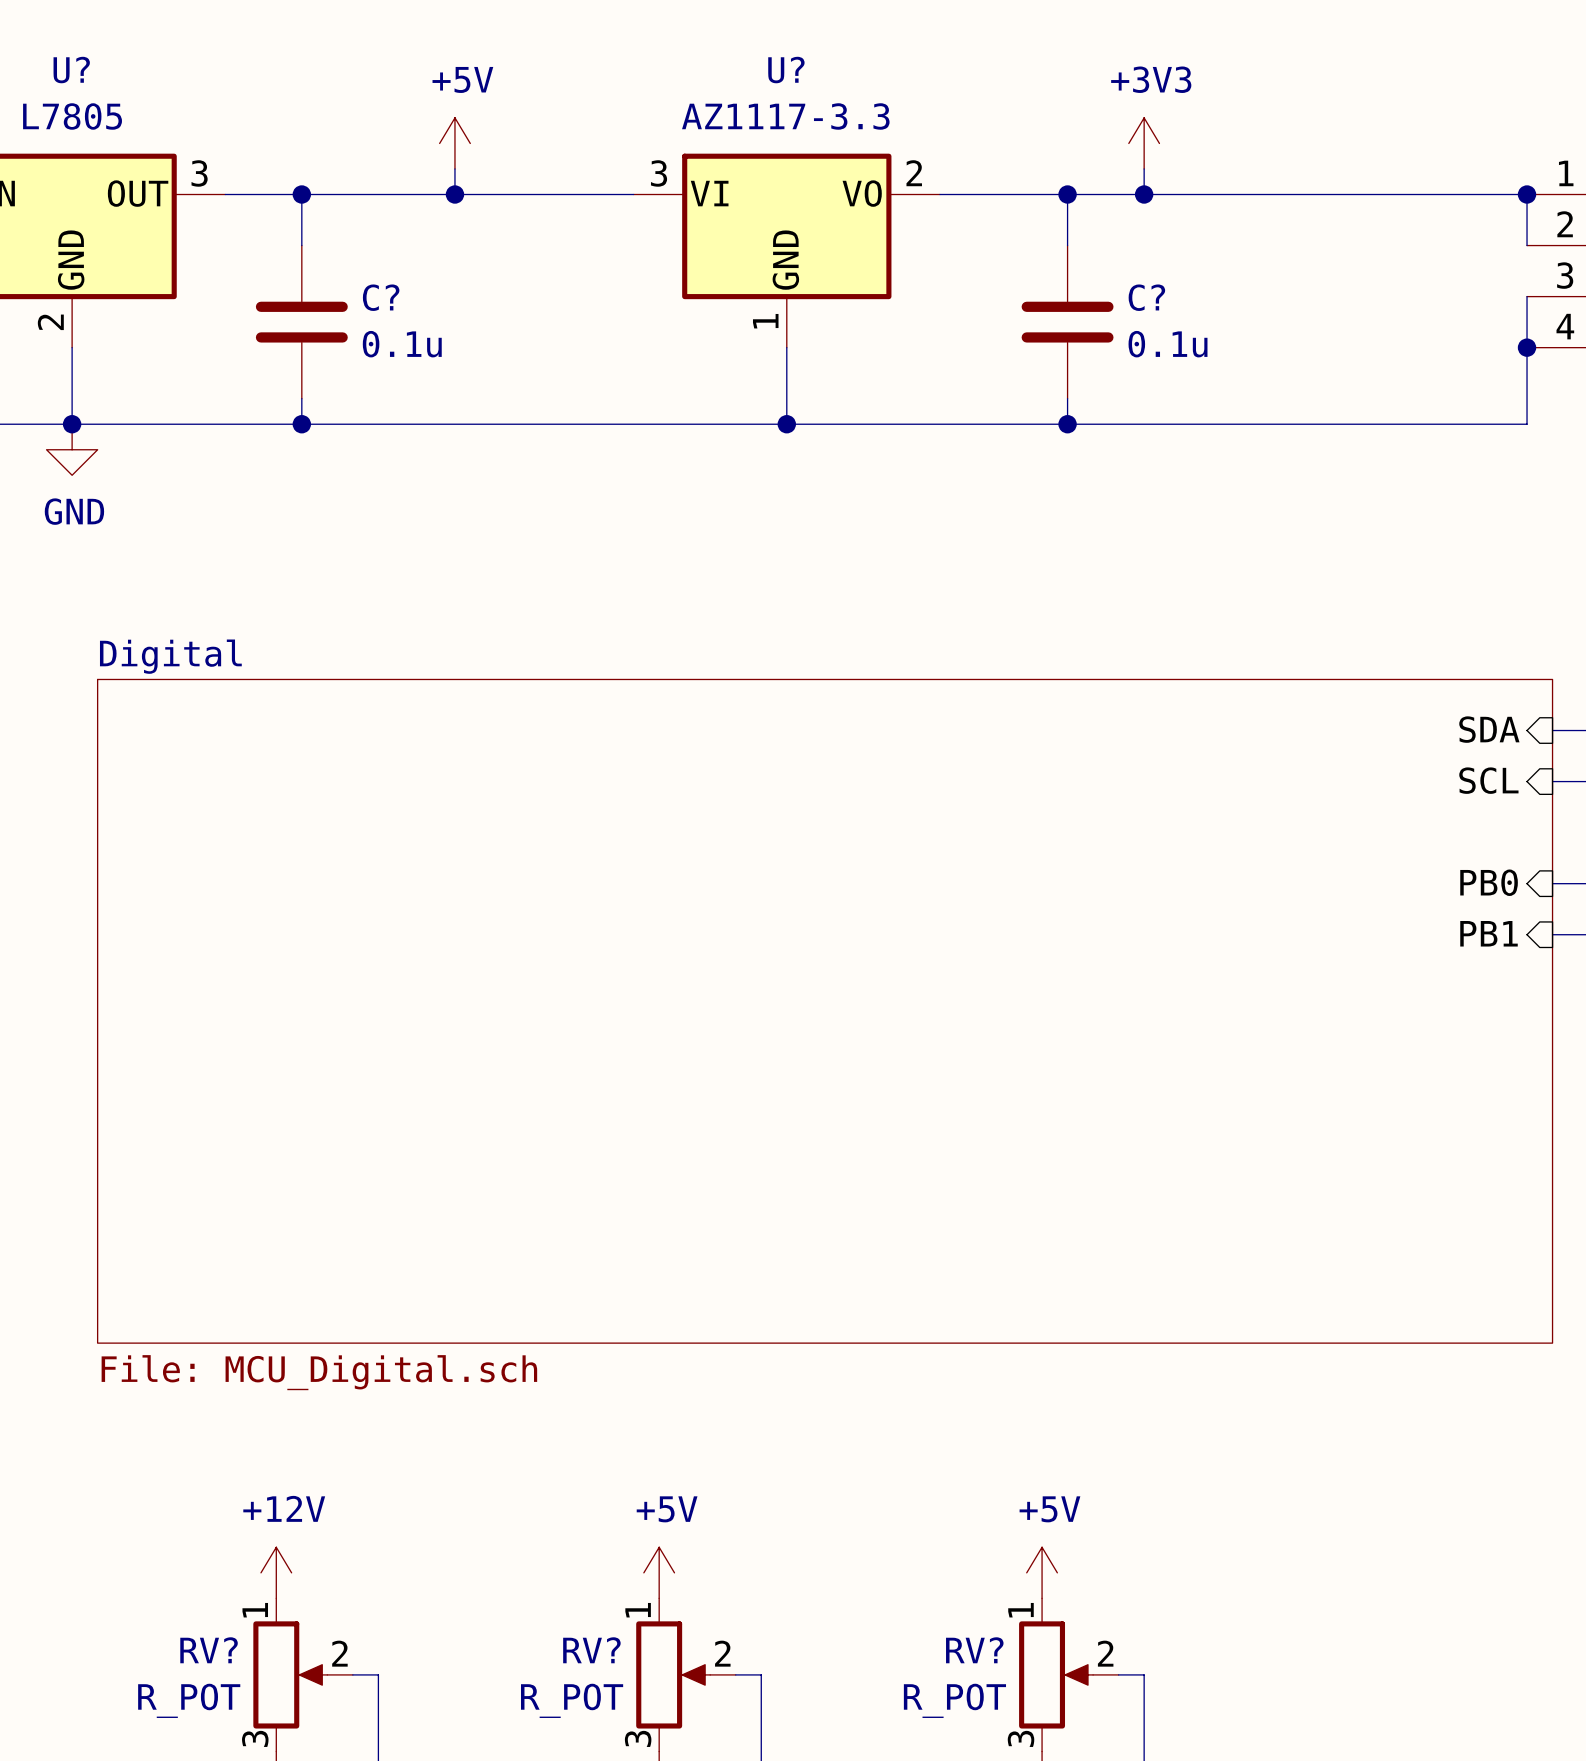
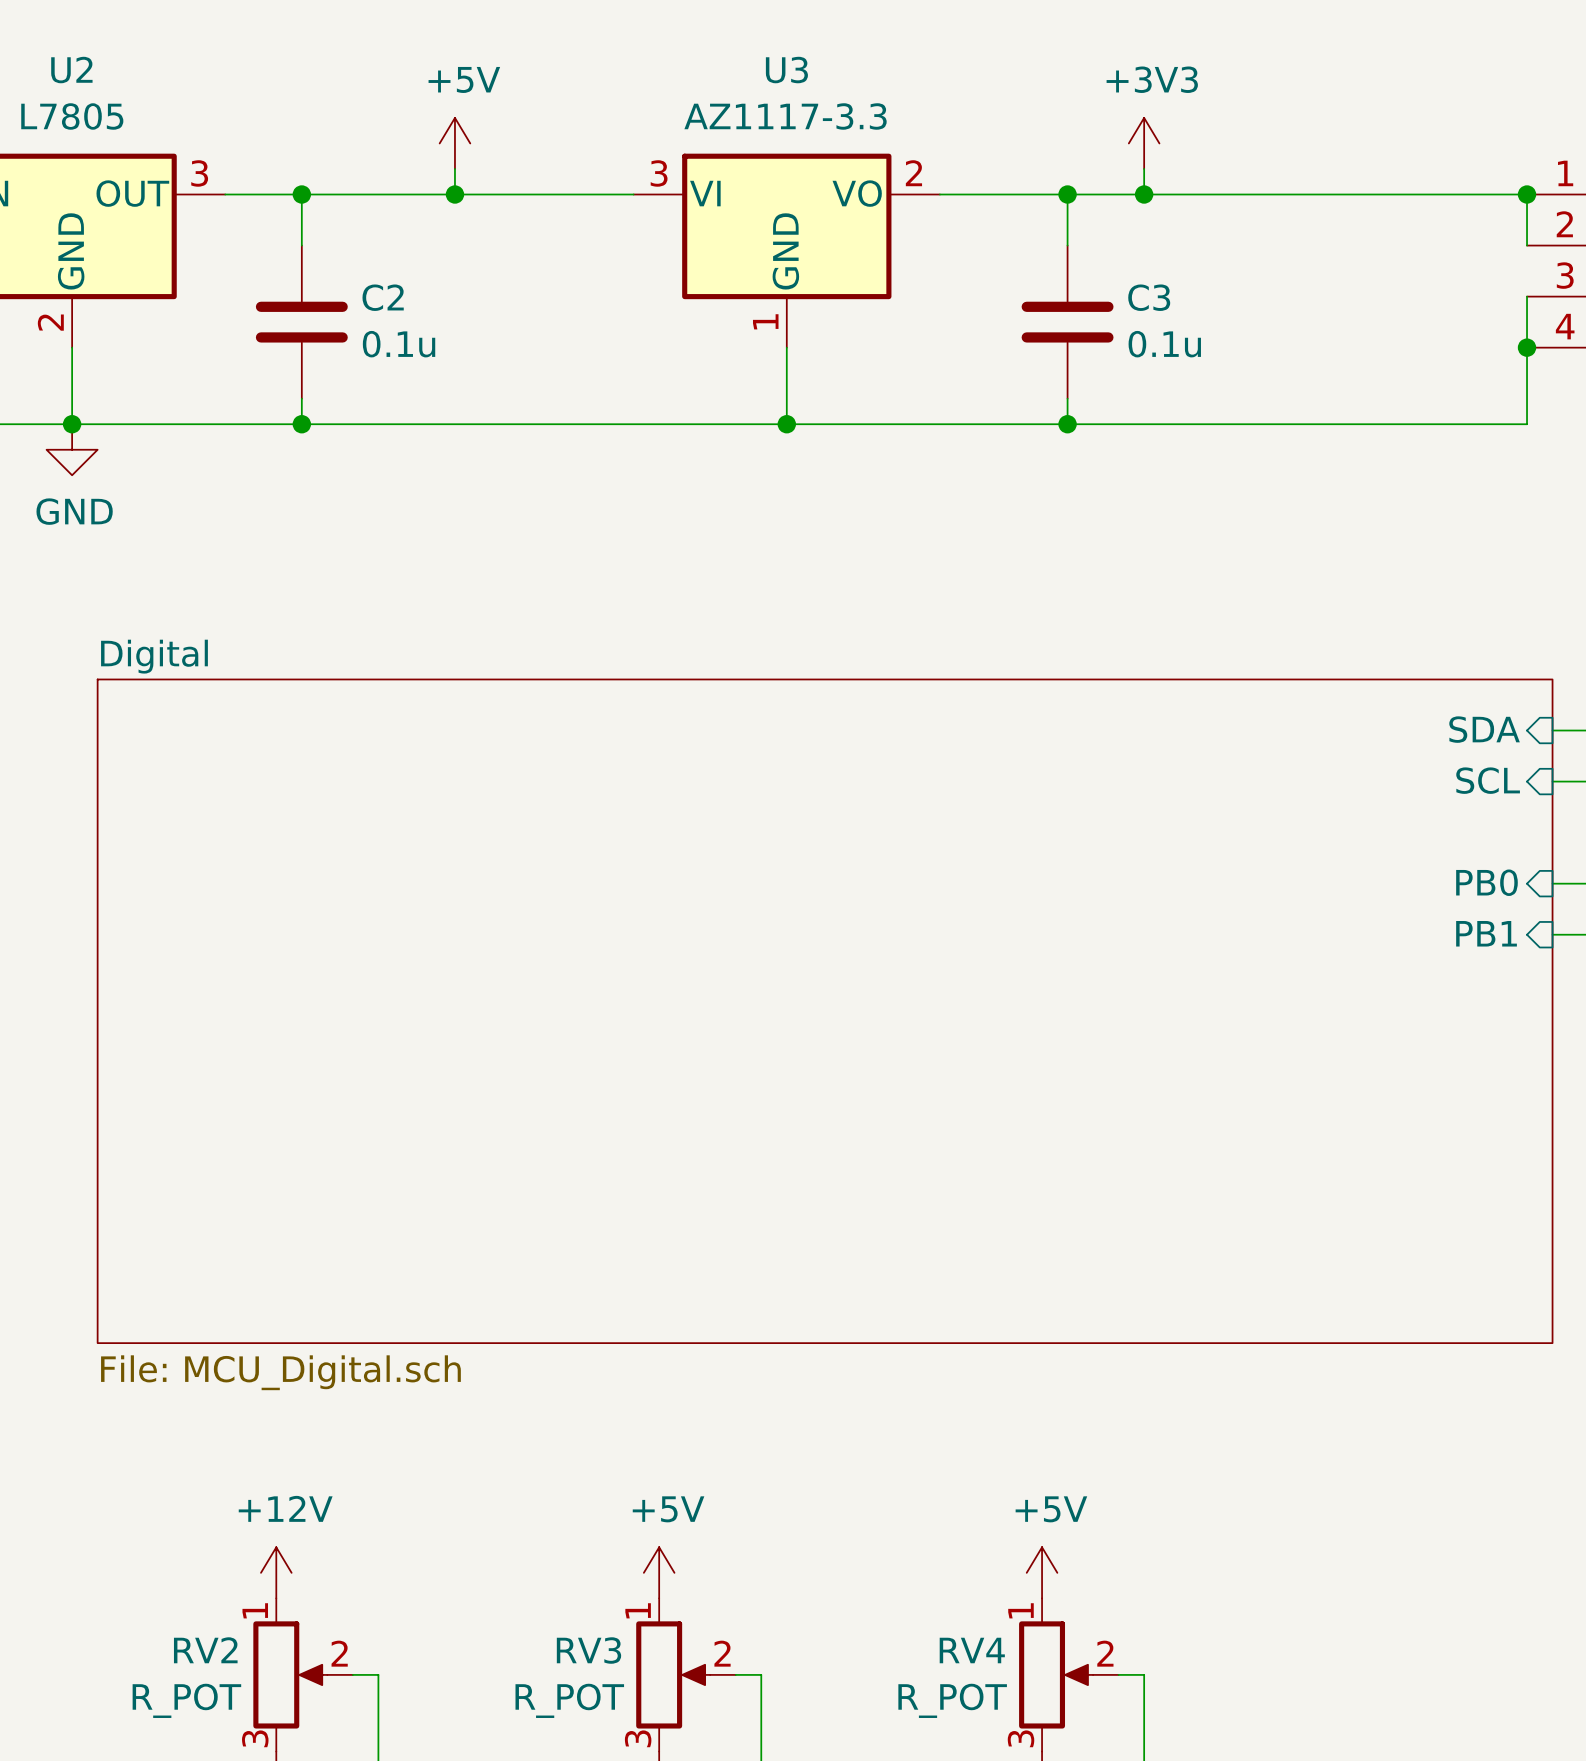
U? name: U? (71, 70) -> U2 (71, 70)
U? name: U? (786, 70) -> U3 (786, 70)
C? name: C? (381, 297) -> C2 (383, 297)
C? name: C? (1146, 297) -> C3 (1149, 297)
RV? name: RV? (209, 1650) -> RV2 (205, 1650)
RV? name: RV? (591, 1650) -> RV3 (588, 1650)
RV? name: RV? (974, 1650) -> RV4 (972, 1650)

